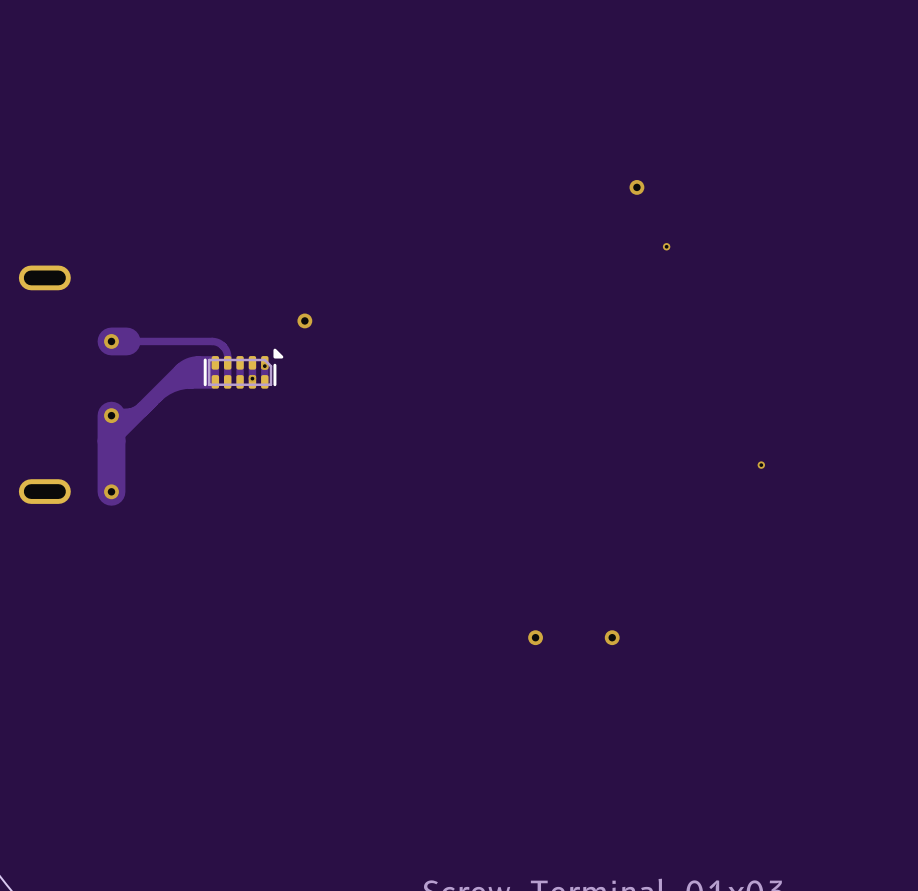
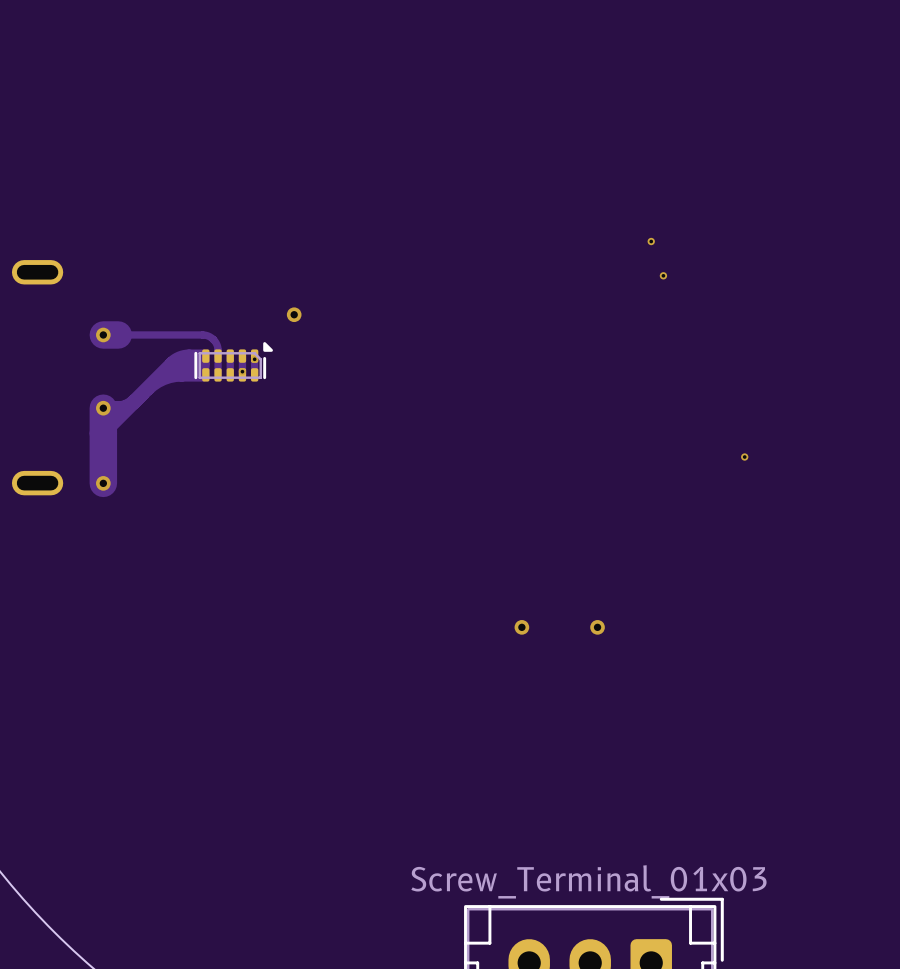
via: (636, 187) -> none
via: none -> (663, 275)

